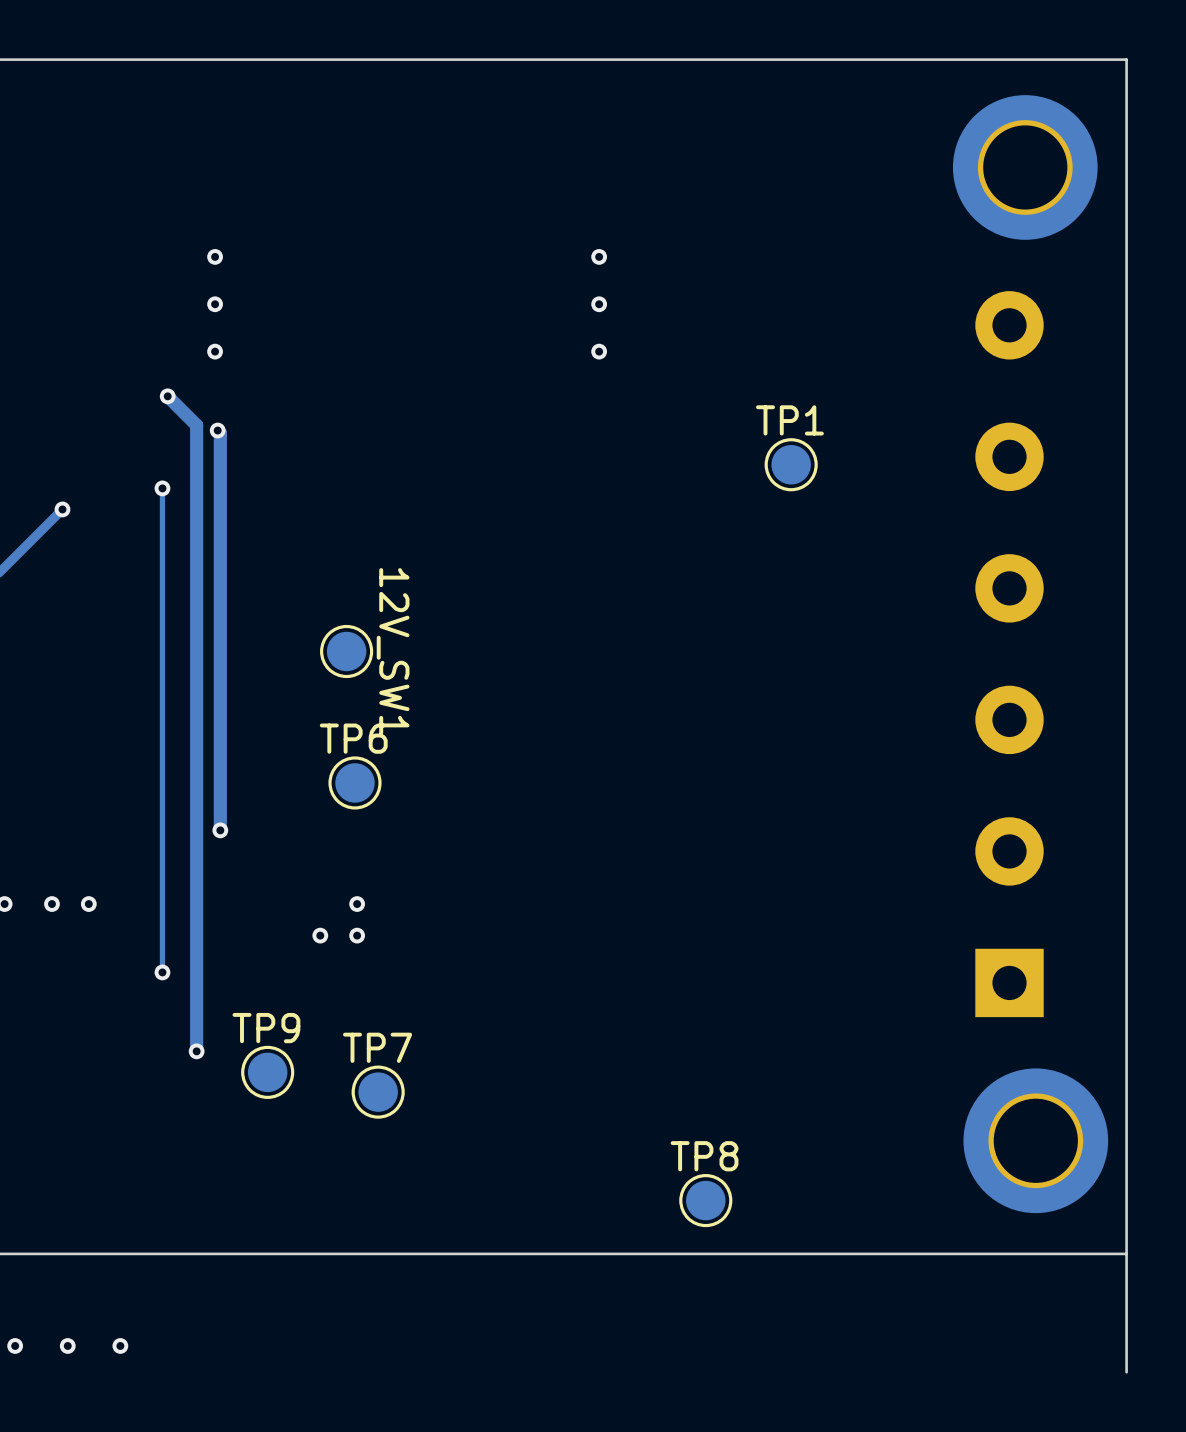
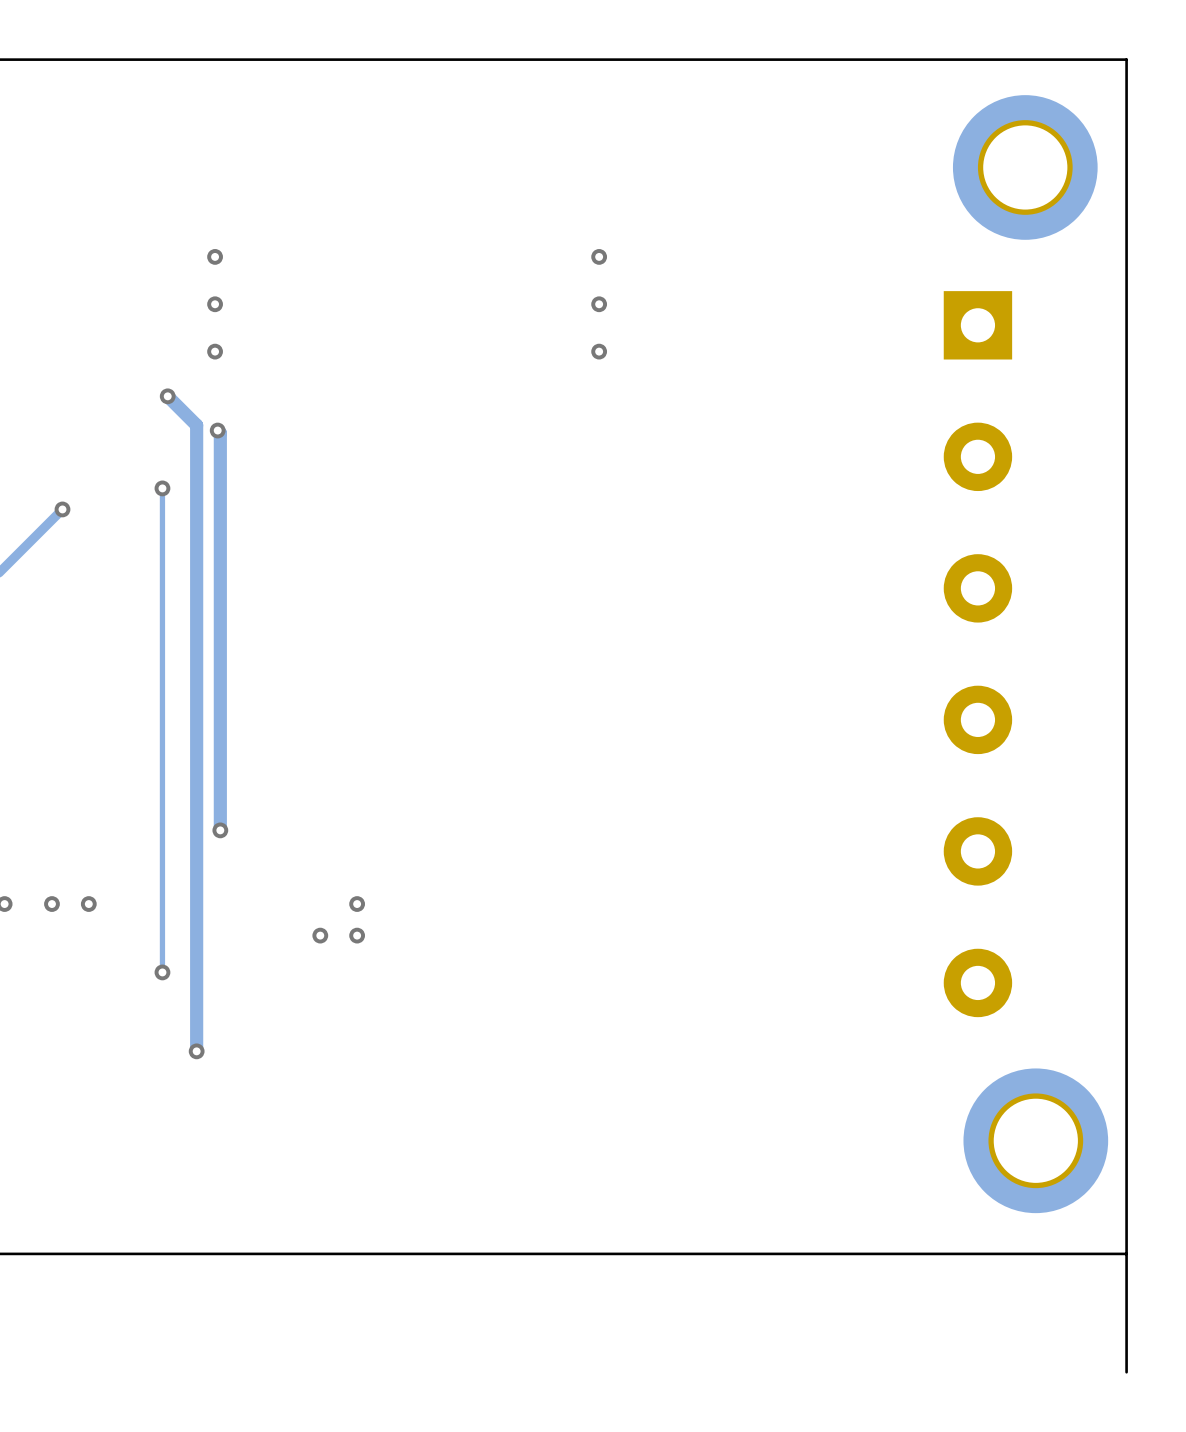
TP1: (791, 464) -> none
12V_SW1: (346, 651) -> none
part rotation: 0° (1009, 654) -> 180° (977, 654)
TP6: (355, 782) -> none
TP9: (267, 1072) -> none
TP7: (378, 1092) -> none
TP8: (705, 1200) -> none
via: (15, 1345) -> none
via: (67, 1345) -> none
via: (120, 1345) -> none

